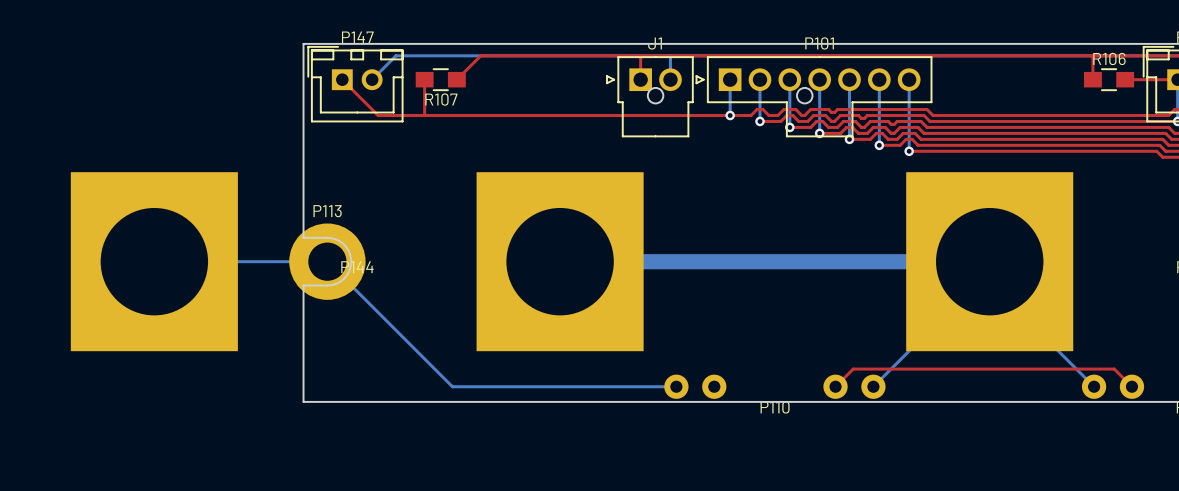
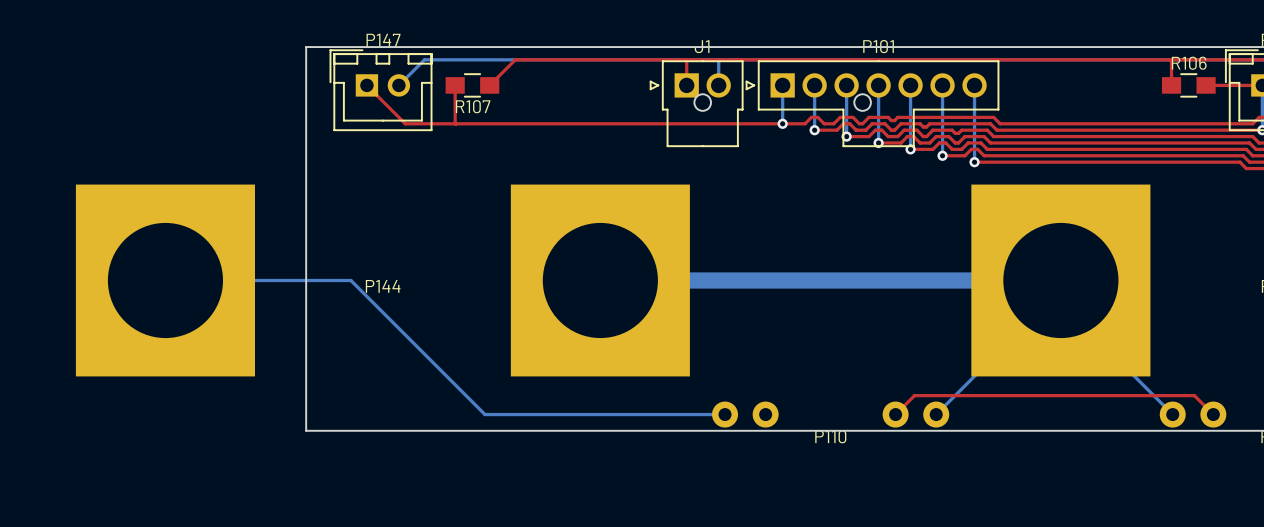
board edge: (303, 43) (303, 237) (330, 238) (339, 241) (348, 249) (351, 261) (348, 273) (339, 282) (330, 285) (303, 285) (303, 401) -> (325, 47) (306, 47) (306, 430) (325, 430)
P113: (327, 261) -> none

